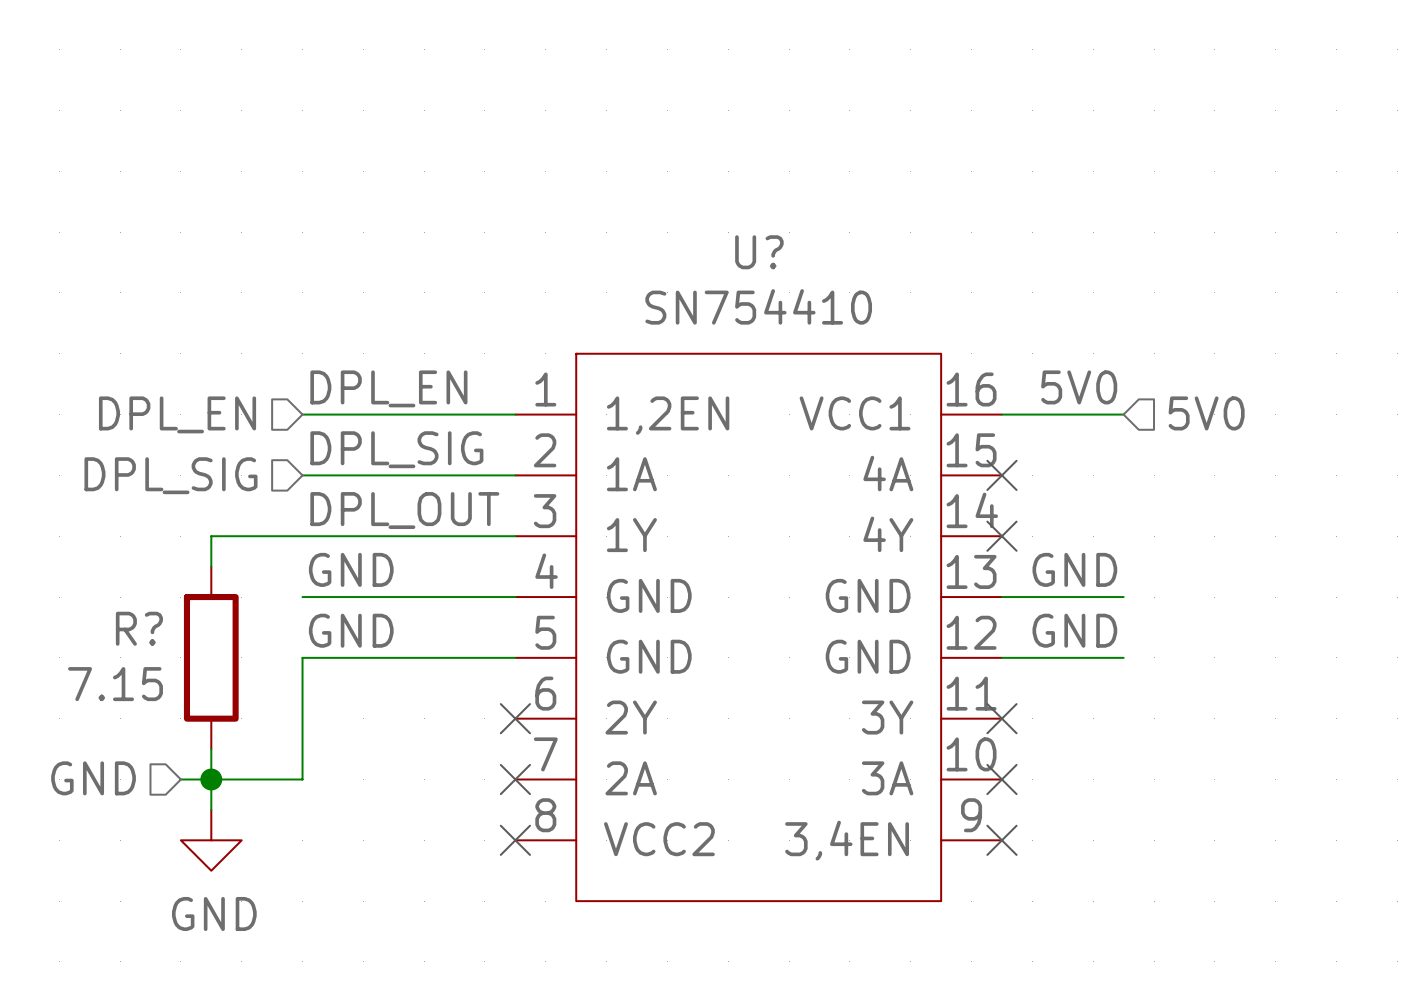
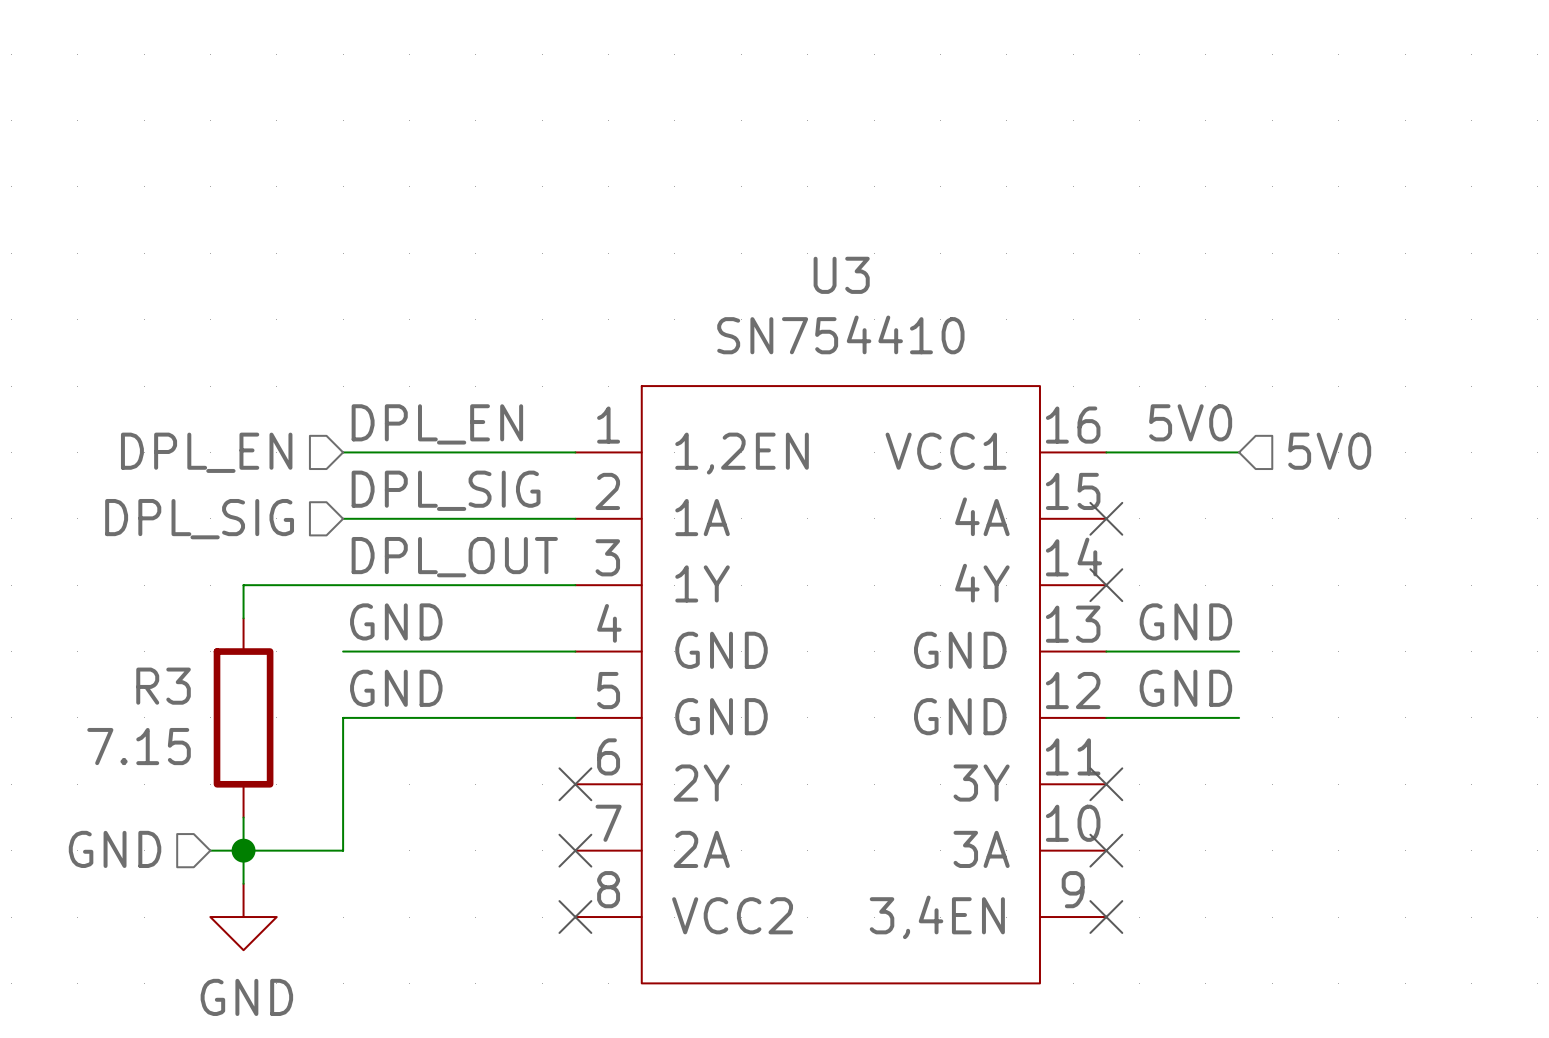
U? name: U? (759, 252) -> U3 (841, 275)
R? name: R? (139, 628) -> R3 (163, 686)

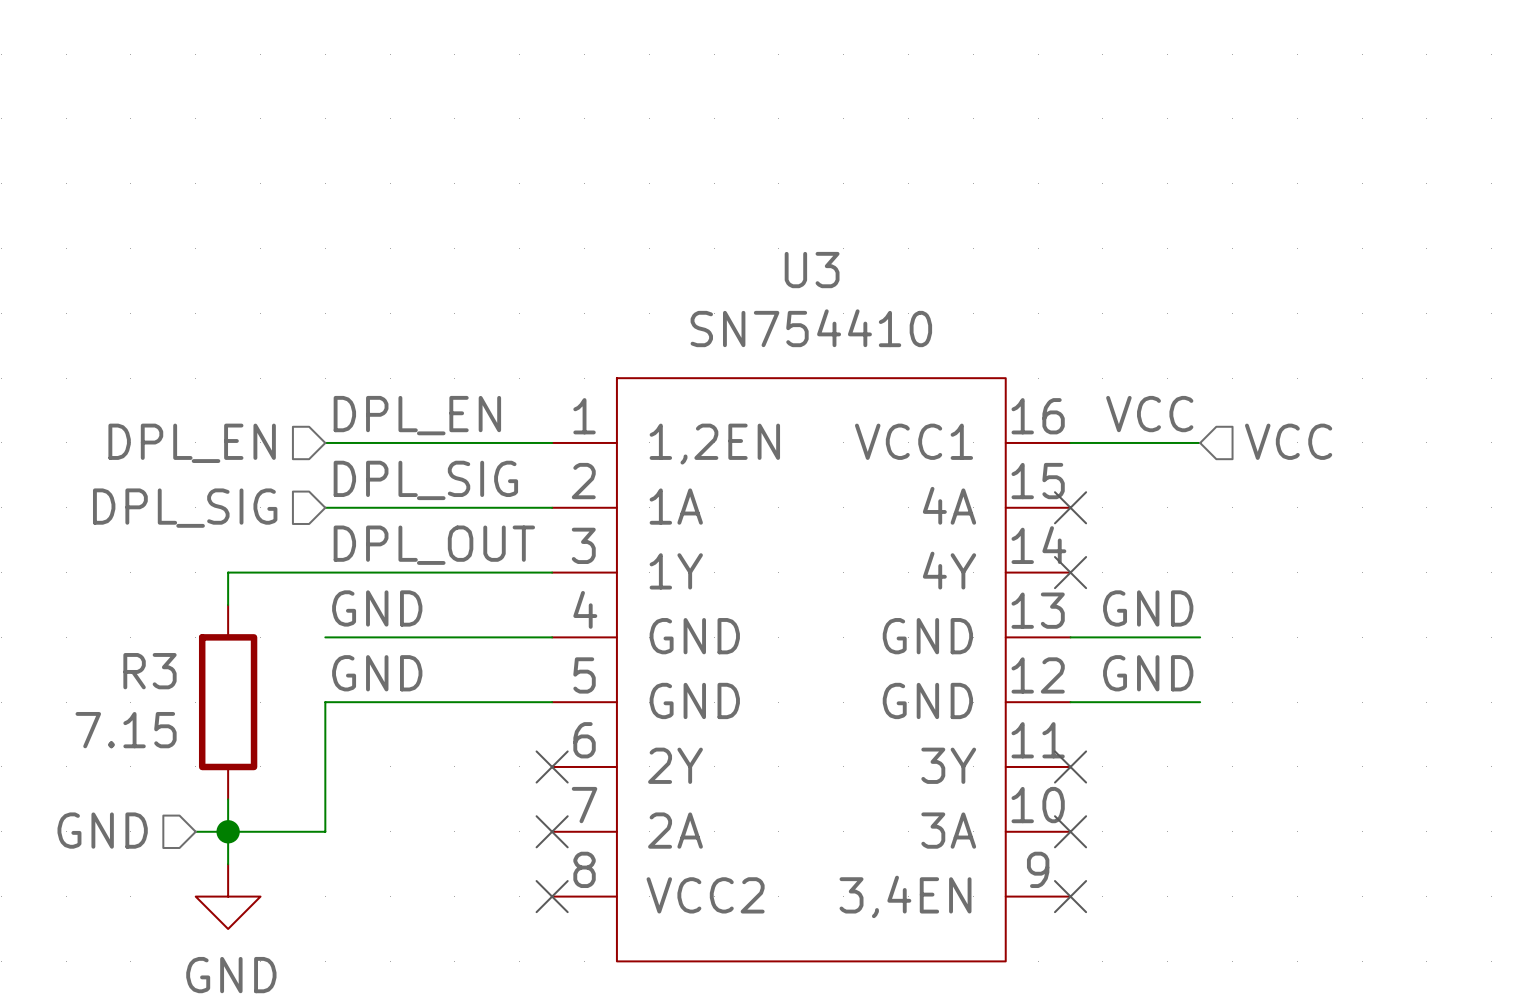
label: 5V0 (1190, 422) -> VCC (1149, 414)
hierarchical label: 5V0 (1329, 451) -> VCC (1288, 441)

